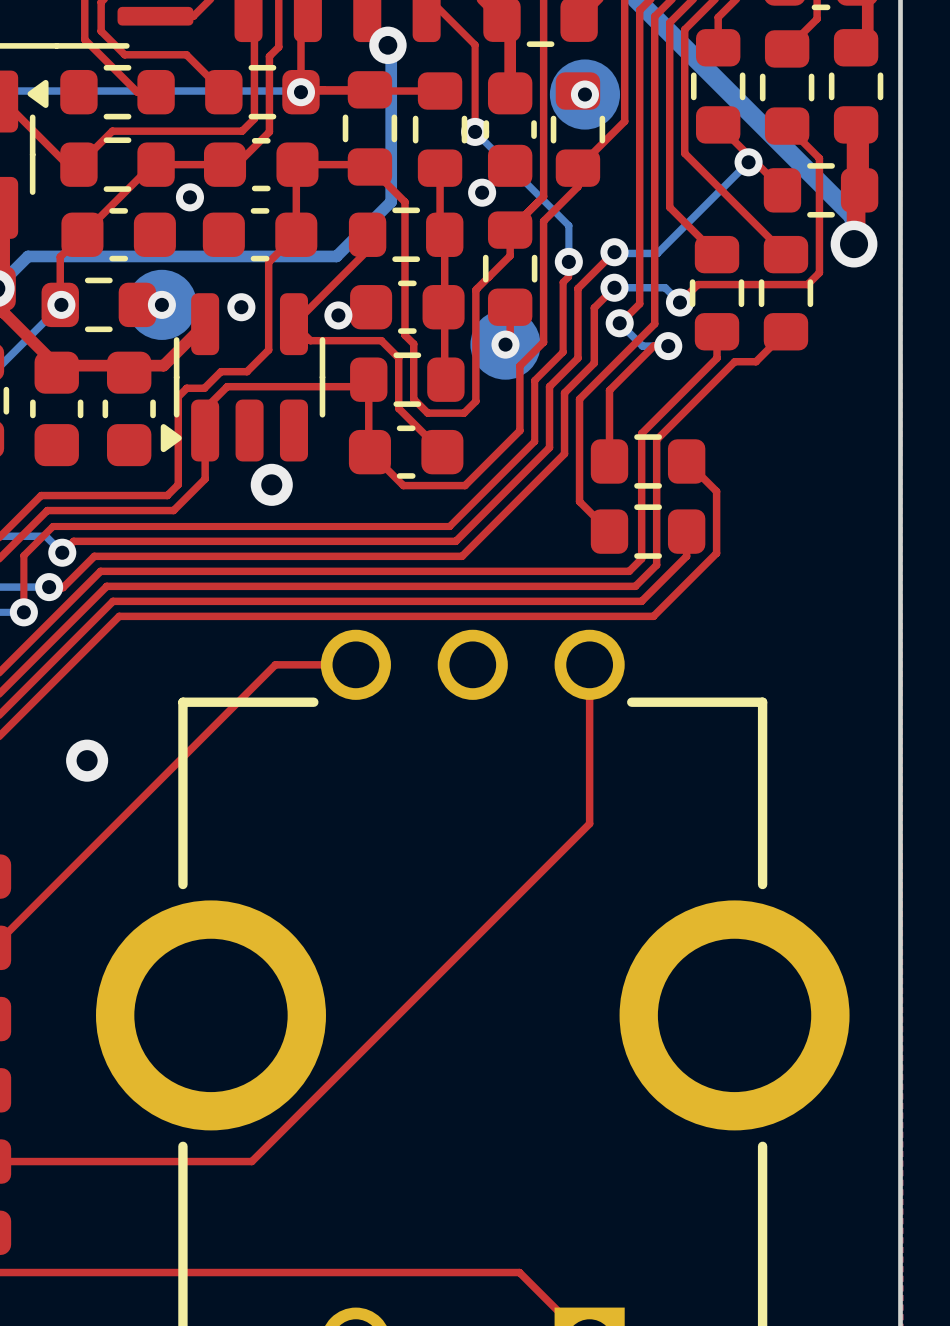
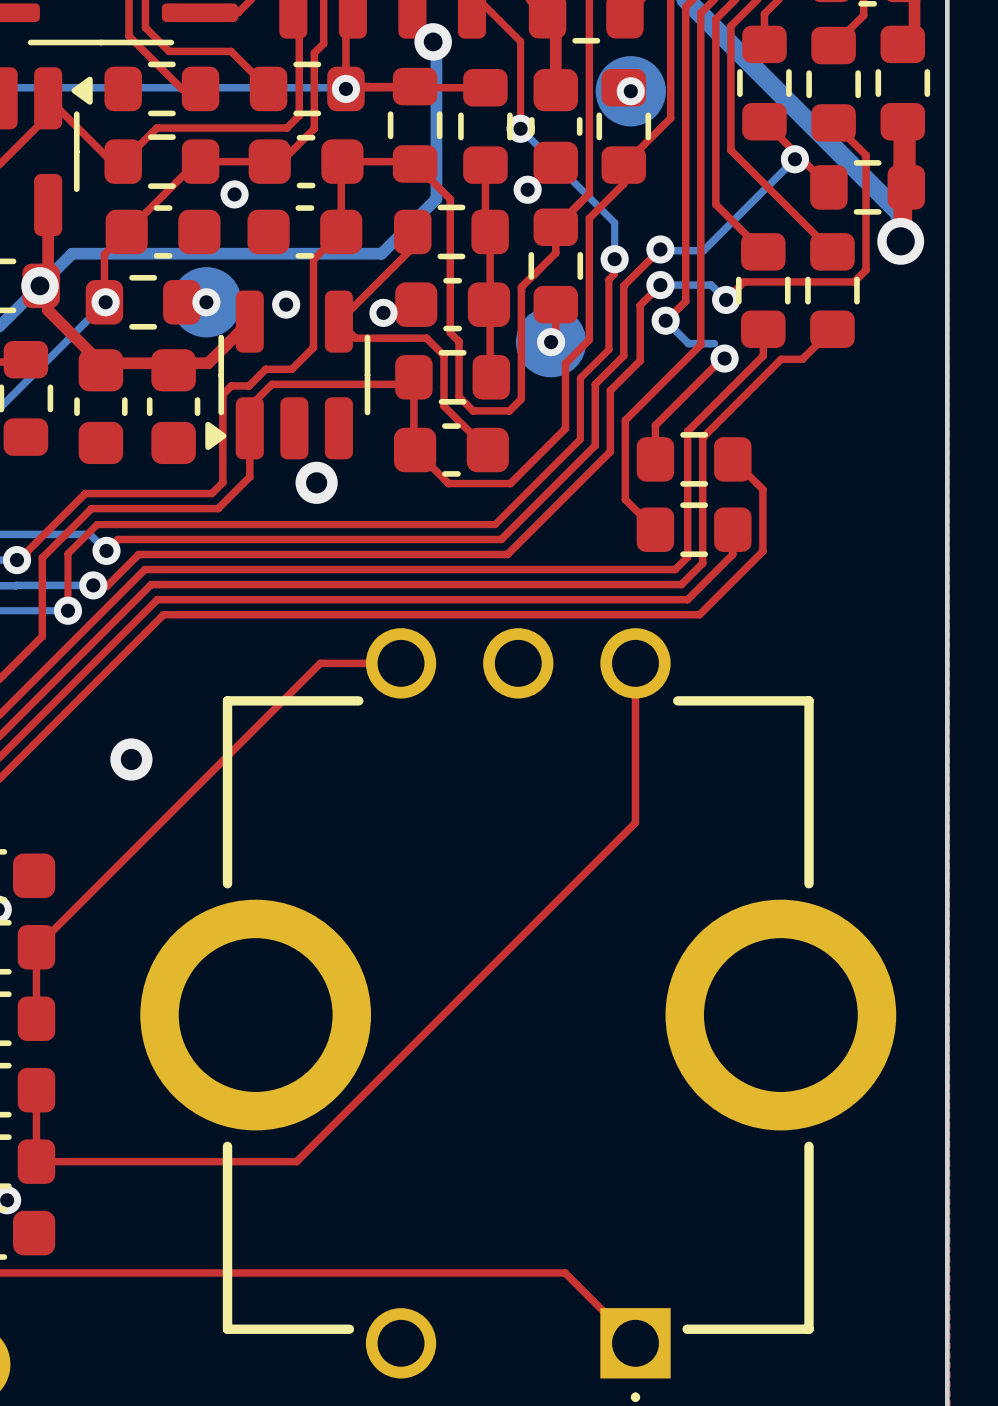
top track: (654, 323) (579, 399) (579, 422) -> (700, 321) (700, 344) (625, 420)
top track: (668, 346) (653, 346) (609, 390) (609, 427) -> (724, 358) (655, 425)
via position: (668, 346) -> (724, 358)

